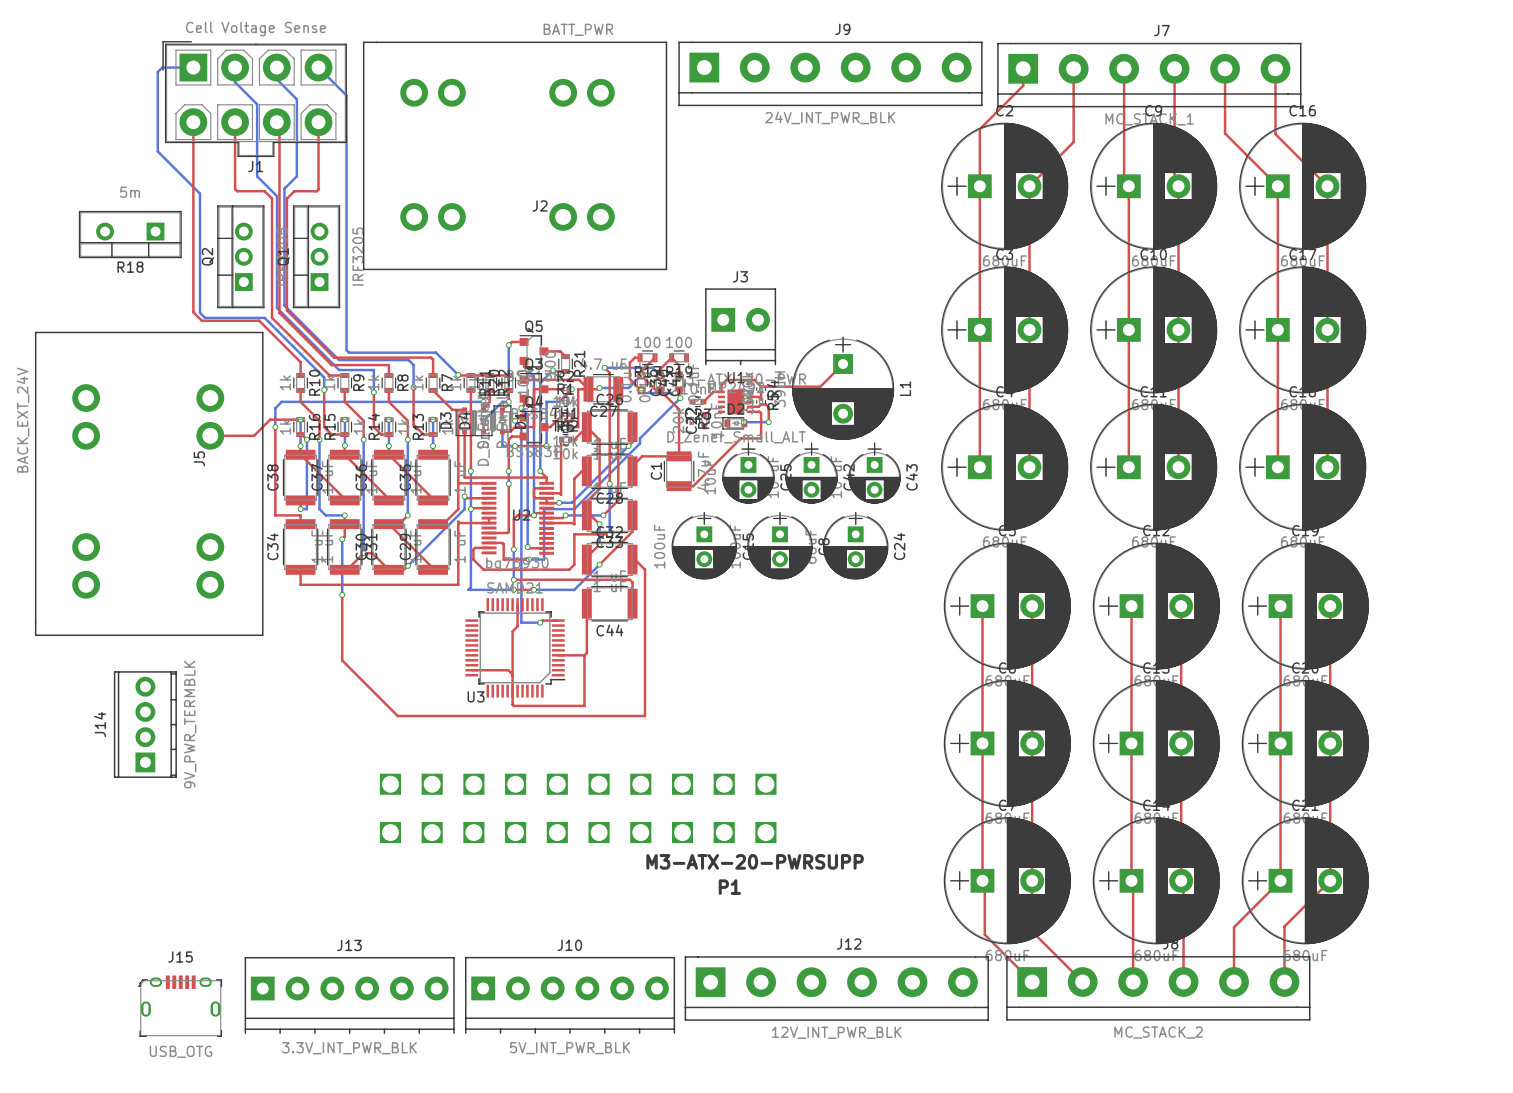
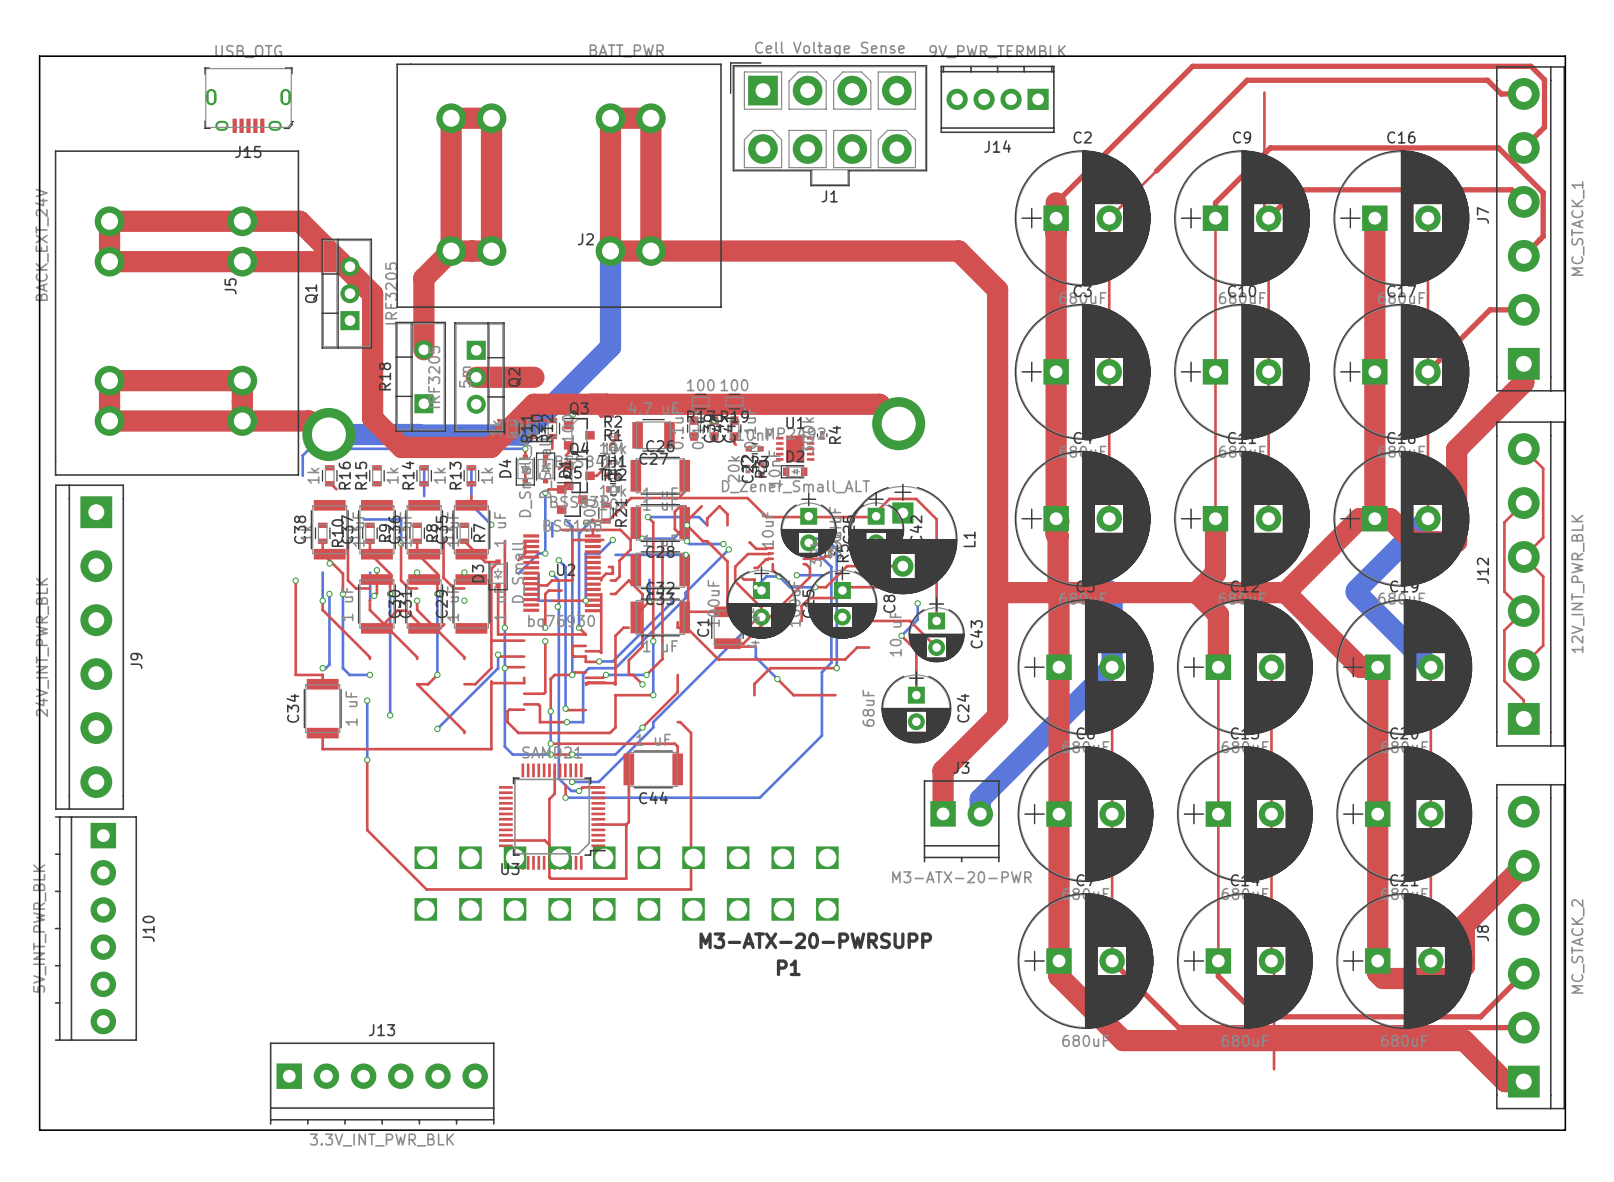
board edge: none -> (39, 56) (1565, 56) (1565, 1130) (39, 1130) (39, 56)
bottom track: (193, 67) (162, 67) (157, 72) (157, 151) (200, 193) (200, 312) (204, 317) (264, 317) (324, 377) (324, 389) -> none
bottom track: (235, 67) (235, 82) (257, 104) (257, 176) (277, 196) (277, 307) (339, 370) (373, 370) (373, 392) -> none
bottom track: (276, 67) (276, 79) (296, 99) (296, 176) (284, 188) (284, 305) (339, 360) (408, 360) (413, 365) (413, 387) -> none
bottom track: (318, 67) (346, 95) (346, 350) (349, 352) (435, 352) (458, 375) -> none
top track: (1023, 68) (1023, 85) (979, 129) (979, 171) -> (1523, 147) (1544, 127) (1544, 79) (1531, 66) (1192, 66) (1056, 202)
top track: (1073, 68) (1073, 142) -> (1523, 93) (1501, 93) (1487, 80) (1247, 80) (1156, 170)
top track: (1124, 68) (1124, 181) -> none
top track: (1225, 68) (1225, 133) (1277, 186) -> none
top track: (1275, 68) (1275, 134) (1327, 186) -> none
J9 rotation: 0° (830, 73) -> 90° clockwise (89, 647)
J9 position: (830, 73) -> (89, 647)
J7 rotation: 0° (1149, 75) -> 90° counterclockwise (1530, 228)
J7 position: (1149, 75) -> (1530, 228)
J1 position: (254, 99) -> (828, 124)
top track: (193, 122) (193, 312) (201, 320) (259, 320) (300, 362) (300, 375) -> none
top track: (235, 122) (235, 189) (237, 191) (264, 191) (272, 198) (272, 317) (329, 375) (344, 375) -> none
top track: (276, 122) (279, 124) (279, 312) (331, 365) (388, 365) (388, 375) -> none
top track: (318, 122) (318, 189) (316, 191) (294, 191) (286, 198) (286, 310) (334, 357) (430, 357) (433, 359) (433, 375) -> none
top track width: thin (979, 171) (979, 467) -> thick (1056, 202) (1056, 518)
top track: none -> (1523, 201) (1511, 189) (1297, 189) (1268, 218)
top track: none -> (1215, 218) (1215, 202) (1270, 147) (1498, 147) (1543, 192) (1543, 236) (1523, 255)
top track width: thin (1277, 186) (1277, 467) -> thick (1374, 218) (1374, 518)
top track: none -> (451, 251) (491, 251) (491, 118) (451, 118) (451, 251)
top track: none -> (451, 251) (423, 278) (423, 349)
bottom track: none -> (610, 251) (610, 347) (522, 435) (328, 434)
top track: none -> (650, 251) (650, 118) (610, 118) (610, 251) (958, 251) (997, 289) (997, 716) (943, 770) (943, 813)
top track: none -> (340, 261) (109, 261) (109, 221) (299, 221) (372, 294) (372, 418) (401, 447) (490, 447) (533, 404) (879, 404) (899, 424)
R18 rotation: 0° (130, 234) -> 90° clockwise (420, 376)
R18 position: (130, 234) -> (420, 376)
Q2 rotation: 0° (240, 256) -> 180° (479, 377)
Q2 position: (240, 256) -> (479, 377)
top track: none -> (1523, 309) (1489, 309) (1427, 371)
top track: none -> (1523, 363) (1523, 382) (1456, 449) (1456, 541) (1413, 541) (1390, 518) (1359, 518) (1285, 592)
J3 position: (740, 326) -> (961, 821)
top track: none -> (476, 377) (533, 377)
top track: (524, 341) (511, 341) (508, 345) -> (561, 489) (548, 489) (545, 492)
bottom track: (508, 345) (508, 401) (502, 401) (483, 420) -> (545, 492) (545, 553) (538, 553) (518, 573)
via: (508, 345) -> none
Q5 position: (533, 351) -> (572, 499)
top track: (640, 357) (634, 357) (629, 362) (629, 379) (641, 390) -> (685, 506) (680, 506) (674, 511) (674, 529) (687, 541)
top track: (654, 357) (641, 371) (641, 375) (679, 409) (679, 456) (642, 456) (632, 466) (632, 471) -> none
R21 position: (565, 364) -> (606, 513)
top track: (843, 364) (820, 386) (761, 386) (754, 379) (726, 379) (721, 385) (721, 391) (713, 391) (703, 401) -> none
top track: (604, 367) (609, 372) (609, 483) -> (647, 517) (653, 522) (653, 641)
bottom track: (604, 367) (652, 367) (660, 375) -> (647, 517) (699, 517) (707, 525)
via: (604, 367) -> none
bottom track: (527, 370) (533, 376) (533, 515) -> (565, 519) (572, 526) (572, 674)
bottom track: (552, 370) (540, 382) (540, 471) -> (592, 519) (579, 533) (579, 627)
via: (552, 370) -> none
top track: none -> (242, 421) (242, 380) (109, 380) (109, 421) (308, 421) (322, 434) (328, 434)
via: (458, 375) -> none
bottom track: (641, 375) (628, 388) (599, 388) -> (687, 525) (673, 538) (642, 538)
via: (641, 375) -> none
top track: (660, 375) (660, 369) (671, 357) (679, 365) (679, 375) -> (707, 525) (707, 518) (719, 506) (727, 514) (727, 525)
via: none -> (898, 423)
top track: (524, 379) (579, 379) (588, 389) -> none
R10 position: (300, 382) -> (322, 533)
R9 position: (344, 382) -> (369, 533)
R8 position: (388, 382) -> (417, 533)
R7 position: (433, 382) -> (464, 533)
top track: (413, 387) (413, 424) (423, 434) (433, 434) -> (443, 538) (443, 577) (454, 588) (464, 588)
via: (413, 387) -> none
via: none -> (328, 434)
top track: (599, 388) (578, 389) (578, 427) (570, 427) -> none
via: (599, 388) -> none
L1 position: (843, 388) -> (902, 539)
top track: (324, 389) (324, 427) (331, 434) (344, 434) -> (347, 540) (347, 580) (355, 588) (369, 588)
via: (324, 389) -> none
top track: (562, 389) (533, 389) (533, 427) (515, 427) (510, 431) (502, 431) -> (603, 540) (572, 540) (572, 580) (552, 580) (547, 585) (538, 585)
bottom track: (571, 389) (559, 401) (546, 401) (546, 446) -> (612, 540) (599, 553) (585, 553) (585, 600)
via: (571, 389) -> none
top track: (618, 389) (618, 500) (603, 515) -> (662, 540) (662, 659) (646, 674)
top track: (300, 390) (300, 401) (319, 420) (319, 439) -> (322, 541) (322, 553) (342, 573) (342, 593)
top track: (344, 390) (344, 401) (363, 420) (363, 439) -> (369, 541) (369, 553) (390, 573) (390, 593)
top track: (388, 390) (388, 401) (407, 420) (407, 439) -> (417, 541) (417, 553) (437, 573) (437, 593)
top track: (433, 390) (452, 409) (464, 409) (458, 416) (458, 509) (443, 524) (433, 524) -> (464, 541) (485, 562) (498, 562) (491, 568) (491, 668) (475, 684) (464, 684)
top track: (470, 390) (470, 471) -> (504, 541) (504, 627)
top track: (489, 390) (489, 401) (483, 408) -> (525, 541) (525, 553) (518, 560)
bottom track: (641, 390) (643, 393) (675, 393) -> (687, 541) (689, 544) (723, 544)
via: (641, 390) -> none
top track: (761, 391) (761, 399) (758, 396) (750, 396) -> none
top track: (373, 392) (373, 427) (381, 434) (388, 434) -> (401, 543) (401, 580) (408, 588) (417, 588)
via: (373, 392) -> none
via: (675, 393) -> none
bottom track: (680, 398) (639, 438) (639, 443) (574, 509) (544, 509) (544, 559) (528, 559) -> none
via: (680, 398) -> none
via: (508, 401) -> none
R5 position: (761, 401) -> (830, 553)
top track: none -> (1523, 449) (1543, 468) (1543, 537) (1523, 557) (1543, 576) (1543, 645) (1523, 664)
top track: (750, 406) (765, 404) (768, 407) (768, 422) -> none
bottom track: (521, 408) (527, 414) (527, 546) -> (558, 560) (565, 567) (565, 708)
via: (521, 408) -> none
top track: (750, 411) (761, 413) (761, 438) (740, 438) (693, 486) (679, 486) -> none
top track: (568, 414) (571, 414) (571, 420) (565, 420) (561, 427) -> (608, 567) (612, 567) (612, 573) (606, 573) (601, 580)
top track: (300, 419) (270, 419) (254, 435) (210, 435) -> none
bottom track: (300, 419) (300, 446) -> (322, 572) (322, 600)
via: (300, 419) -> none
bottom track: (344, 419) (344, 445) -> (370, 572) (370, 600)
via: (344, 419) -> none
via: (388, 419) -> none
via: (433, 419) -> none
bottom track: (502, 420) (502, 446) (515, 446) -> (538, 573) (538, 600) (552, 600)
bottom track: (515, 420) (521, 427) (521, 622) (540, 622) -> none
via: (515, 420) -> none
D3 position: (464, 421) -> (498, 574)
bottom track: (743, 422) (768, 422) -> (796, 575) (823, 575)
via: (743, 422) -> none
via: (768, 422) -> none
top track: (275, 427) (275, 515) (300, 515) (300, 524) -> (295, 580) (295, 674) (322, 674) (322, 684)
via: (275, 427) -> none
top track: (464, 431) (464, 477) (546, 477) (540, 471) -> (498, 585) (498, 634) (585, 634) (579, 627)
top track: (524, 436) (511, 436) (508, 439) (508, 471) -> (561, 590) (548, 590) (545, 593) (545, 627)
bottom track: (306, 439) (306, 509) (300, 509) -> none
via: (306, 439) -> none
bottom track: (319, 439) (319, 509) (325, 515) (344, 515) -> (342, 593) (342, 668) (349, 674) (369, 674)
via: (319, 439) -> none
bottom track: (363, 439) (363, 553) -> (390, 593) (390, 715)
via: (363, 439) -> none
bottom track: (407, 439) (407, 515) -> (437, 593) (437, 674)
via: (407, 439) -> none
top track: (561, 439) (561, 494) (546, 493) -> (601, 593) (601, 652) (585, 651)
top track: (570, 439) (574, 439) (586, 427) (599, 439) (599, 488) (586, 501) (586, 515) (590, 515) (599, 524) -> (610, 593) (615, 593) (628, 580) (642, 594) (642, 646) (628, 660) (628, 674) (633, 674) (642, 684)
via: none -> (545, 492)
top track: (344, 445) (344, 454) (388, 500) -> (370, 600) (369, 610) (417, 658)
via: (344, 445) -> none
top track: (300, 446) (300, 454) (344, 500) -> (322, 600) (322, 610) (369, 658)
via: (300, 446) -> none
top track: (388, 446) (388, 454) (433, 500) -> (417, 600) (417, 610) (464, 658)
via: (388, 446) -> none
via: (433, 446) -> none
top track: (515, 446) (546, 446) -> (552, 600) (585, 600)
via: (515, 446) -> none
via: (546, 446) -> none
bottom track: (628, 446) (571, 502) (559, 502) -> (673, 600) (612, 661) (599, 661)
via: (628, 446) -> none
bottom track: none -> (467, 500) (491, 524)
top track: none -> (1523, 503) (1504, 522) (1504, 591) (1523, 610) (1504, 630) (1504, 680) (1523, 700) (1523, 718)
top track: none -> (701, 506) (687, 521) (687, 525) (702, 541) (707, 541) (727, 561) (727, 611) (688, 611) (688, 557) (685, 554)
via: none -> (647, 517)
bottom track: none -> (363, 519) (401, 519) (401, 543)
bottom track: none -> (1427, 518) (1356, 592) (1430, 667)
top track: none -> (592, 519) (608, 521) (631, 498) (747, 498) (766, 517) (871, 517) (889, 498) (916, 498) (936, 519) (936, 620)
top track: none -> (1059, 521) (1056, 518) (1056, 534) (1058, 536) (1059, 667)
top track: none -> (1218, 521) (1215, 518) (1215, 573) (1196, 592) (1218, 614) (1218, 667)
bottom track: (470, 471) (470, 587) (468, 589) (513, 589) -> none
via: (470, 471) -> none
via: (508, 471) -> none
top track: (586, 471) (581, 471) (574, 478) (574, 524) (546, 523) -> (628, 627) (623, 627) (615, 635) (615, 684) (585, 683)
C1 position: (679, 471) -> (727, 627)
via: none -> (491, 524)
via: none -> (687, 525)
C43 position: (874, 473) -> (936, 629)
top track: none -> (561, 529) (620, 529) (630, 540) (630, 549) (619, 560) (619, 576) (615, 580) (610, 580)
J5 position: (149, 483) -> (176, 313)
top track: (488, 483) (458, 483) -> (524, 640) (491, 641)
top track: (508, 483) (508, 531) (488, 533) -> (545, 641) (545, 692) (524, 693)
via: (508, 483) -> none
bottom track: (609, 483) (609, 534) -> (653, 641) (653, 695)
via: (609, 483) -> none
via: none -> (642, 538)
bottom track: none -> (804, 538) (825, 538) (836, 549) (836, 668)
via: none -> (612, 540)
top track: (546, 488) (534, 488) (533, 496) (546, 498) (546, 503) (559, 502) -> (585, 645) (572, 645) (572, 654) (574, 656) (585, 656) (585, 661) (599, 661)
via: none -> (687, 541)
top track: none -> (749, 542) (756, 548) (772, 548)
via: none -> (401, 543)
via: none -> (723, 544)
bottom track: none -> (728, 549) (685, 592) (685, 598) (615, 668) (588, 668) (583, 673) (583, 722) (566, 722)
via: none -> (728, 549)
top track: (464, 496) (466, 498) (488, 498) -> (498, 654) (499, 656) (524, 656)
bottom track: (464, 496) (464, 509) (407, 565) -> (498, 654) (498, 668) (437, 728)
via: (464, 496) -> none
bottom track: none -> (816, 552) (831, 567) (831, 662) (821, 672) (821, 735) (759, 797) (565, 797)
via: none -> (545, 553)
top track: none -> (772, 553) (747, 554) (735, 566) (735, 581) (761, 607) (761, 614) (750, 625)
bottom track: none -> (615, 554) (685, 554)
via: none -> (685, 554)
via: (559, 502) -> none
top track: none -> (830, 556) (825, 556) (822, 558) (803, 558)
top track: none -> (772, 558) (766, 559) (757, 567) (754, 567)
via: none -> (558, 560)
top track: (488, 508) (470, 509) -> (524, 667) (504, 668)
via: (470, 509) -> none
top track: none -> (772, 564) (772, 570) (779, 576)
top track: none -> (803, 564) (809, 568) (809, 577) (743, 643) (727, 643) (730, 646) (755, 646)
top track: none -> (902, 566) (847, 566) (825, 587) (815, 587)
top track: (546, 513) (517, 515) (513, 519) (513, 549) -> (585, 672) (554, 674) (550, 678) (550, 711)
top track: (407, 515) (399, 524) (388, 524) (433, 569) -> (437, 674) (428, 684) (417, 684) (464, 733)
via: (407, 515) -> none
via: (533, 515) -> none
top track: (565, 515) (562, 518) (546, 518) -> (606, 674) (603, 677) (585, 677)
bottom track: (565, 515) (603, 515) -> (606, 674) (646, 674)
via: (565, 515) -> none
via: (603, 515) -> none
top track: (632, 515) (632, 531) (599, 564) -> (677, 674) (677, 692) (642, 727)
via: none -> (417, 572)
via: none -> (464, 572)
top track: (488, 518) (488, 523) (458, 521) (458, 584) (300, 584) (300, 569) -> (524, 677) (524, 683) (491, 681) (491, 749) (322, 749) (322, 733)
bottom track: none -> (552, 573) (558, 580) (558, 778) (571, 790) (579, 790)
via: none -> (552, 573)
via: none -> (796, 575)
top track: none -> (740, 576) (744, 579) (754, 579) (755, 587)
via: none -> (779, 576)
via: (599, 524) -> none
via: none -> (295, 580)
bottom track: none -> (755, 587) (766, 576) (779, 576) (789, 587) (815, 587)
via: none -> (755, 587)
via: none -> (815, 587)
top track: none -> (917, 587) (846, 587) (835, 598) (809, 598) (801, 606) (801, 620)
top track: (609, 534) (574, 534) (574, 564) (569, 569) (483, 569) (473, 559) (473, 549) (488, 547) -> (653, 695) (615, 695) (615, 727) (610, 732) (518, 732) (507, 722) (507, 711) (509, 709) (524, 709)
top track: none -> (997, 591) (999, 592) (1285, 592)
bottom track: none -> (1108, 590) (1112, 593) (1112, 667) (980, 799) (980, 813)
top track: none -> (1285, 592) (1360, 667) (1377, 667)
bottom track: none -> (329, 593) (329, 664) (322, 668)
via: none -> (329, 593)
via: none -> (342, 593)
via: none -> (390, 593)
via: none -> (437, 593)
bottom track: (342, 539) (342, 594) -> (367, 700) (367, 759)
top track: (488, 542) (503, 544) (503, 559) (528, 559) -> (524, 704) (539, 705) (539, 722) (566, 722)
via: none -> (322, 600)
via: none -> (417, 600)
via: none -> (464, 600)
via: none -> (585, 600)
C24 position: (855, 545) -> (916, 707)
C34 position: (300, 546) -> (322, 708)
top track: (527, 546) (546, 548) -> (565, 708) (585, 710)
via: (527, 546) -> none
bottom track: none -> (917, 603) (917, 619) (901, 635)
via: none -> (917, 603)
bottom track: (513, 549) (513, 579) -> (550, 711) (550, 743)
via: (363, 553) -> none
via: (528, 559) -> none
top track: (632, 559) (645, 569) (645, 716) (397, 716) (342, 660) (342, 594) -> (677, 722) (680, 722) (691, 732) (691, 889) (426, 889) (367, 830) (367, 759)
top track: none -> (869, 620) (910, 620) (936, 647)
top track: none -> (677, 622) (677, 627) (686, 627) (718, 659) (845, 659) (857, 647) (869, 647)
bottom track: (599, 564) (574, 589) (533, 589) -> (642, 727) (615, 754) (572, 754)
via position: (599, 564) -> (653, 641)
via: (407, 565) -> none
bottom track: none -> (750, 625) (653, 722) (653, 727) (598, 781) (572, 781)
bottom track: none -> (504, 627) (504, 746) (512, 754) (550, 754)
via: none -> (504, 627)
via: none -> (545, 627)
via: none -> (579, 627)
top track: none -> (901, 635) (916, 650) (916, 695)
via: none -> (901, 635)
top track: (513, 579) (629, 579) (632, 582) (632, 603) -> (550, 743) (674, 743) (677, 746) (677, 769)
via: (513, 579) -> none
via: none -> (545, 641)
bottom track: none -> (755, 646) (755, 657) (777, 678)
top track: (513, 589) (533, 589) -> (550, 754) (572, 754)
via: (513, 589) -> none
via: (533, 589) -> none
via position: (342, 594) -> (369, 674)
via: none -> (498, 654)
via: none -> (599, 661)
top track: (586, 603) (586, 653) (584, 655) (558, 655) -> (628, 769) (628, 822) (626, 824) (598, 824)
C44 position: (609, 603) -> (653, 769)
top track: (517, 604) (517, 626) (512, 631) (513, 705) (584, 705) (584, 655) -> (554, 770) (554, 793) (549, 799) (550, 878) (626, 878) (626, 824)
top track width: thin (982, 606) (982, 880) -> thick (1059, 667) (1059, 960)
top track width: thin (1280, 606) (1280, 880) -> thick (1377, 667) (1377, 960)
via: none -> (322, 668)
via: none -> (504, 668)
top track: none -> (836, 668) (770, 668) (754, 684) (754, 695)
via: none -> (836, 668)
via: none -> (437, 674)
via: none -> (572, 674)
via: none -> (606, 674)
via: none -> (646, 674)
top track: none -> (777, 678) (793, 695) (835, 695)
via: none -> (777, 678)
via: (540, 622) -> none
via: none -> (642, 684)
via: none -> (653, 695)
via: none -> (367, 700)
via: none -> (565, 708)
via: none -> (550, 711)
U3 position: (515, 647) -> (552, 816)
via: none -> (390, 715)
via: none -> (566, 722)
via: none -> (642, 727)
via: none -> (437, 728)
top track: (471, 670) (508, 670) (512, 674) -> (505, 840) (544, 840) (549, 844)
via: none -> (550, 743)
via: none -> (550, 754)
via: none -> (572, 754)
via: none -> (367, 759)
via: none -> (572, 781)
top track: none -> (565, 785) (565, 797)
top track: none -> (598, 787) (582, 787) (579, 790)
via: none -> (579, 790)
J14 rotation: 0° (145, 724) -> 90° counterclockwise (997, 99)
J14 position: (145, 724) -> (997, 99)
via: none -> (565, 797)
top track: (982, 880) (984, 883) (984, 934) (1032, 982) -> (1059, 960) (1059, 976) (1123, 1040) (1464, 1040) (1505, 1081) (1523, 1081)
top track: (1031, 880) (1031, 931) (1082, 982) -> (1111, 961) (1178, 1027) (1523, 1027)
top track: none -> (1218, 960) (1218, 976) (1258, 1016) (1480, 1016) (1523, 973)
top track: (1280, 880) (1234, 927) (1234, 982) -> (1377, 960) (1377, 973) (1383, 978) (1452, 978) (1464, 966) (1464, 925) (1523, 865)
top track: (1330, 880) (1284, 926) (1284, 982) -> none
top track: (1133, 882) (1133, 982) -> none
J12 rotation: 0° (836, 988) -> 90° counterclockwise (1530, 584)
J12 position: (836, 988) -> (1530, 584)
J8 rotation: 0° (1158, 988) -> 90° counterclockwise (1530, 946)
J8 position: (1158, 988) -> (1530, 946)
J10 rotation: 0° (570, 995) -> 90° clockwise (95, 928)
J10 position: (570, 995) -> (95, 928)
J15 rotation: 0° (180, 1006) -> 180° (249, 100)
J15 position: (180, 1006) -> (249, 100)

